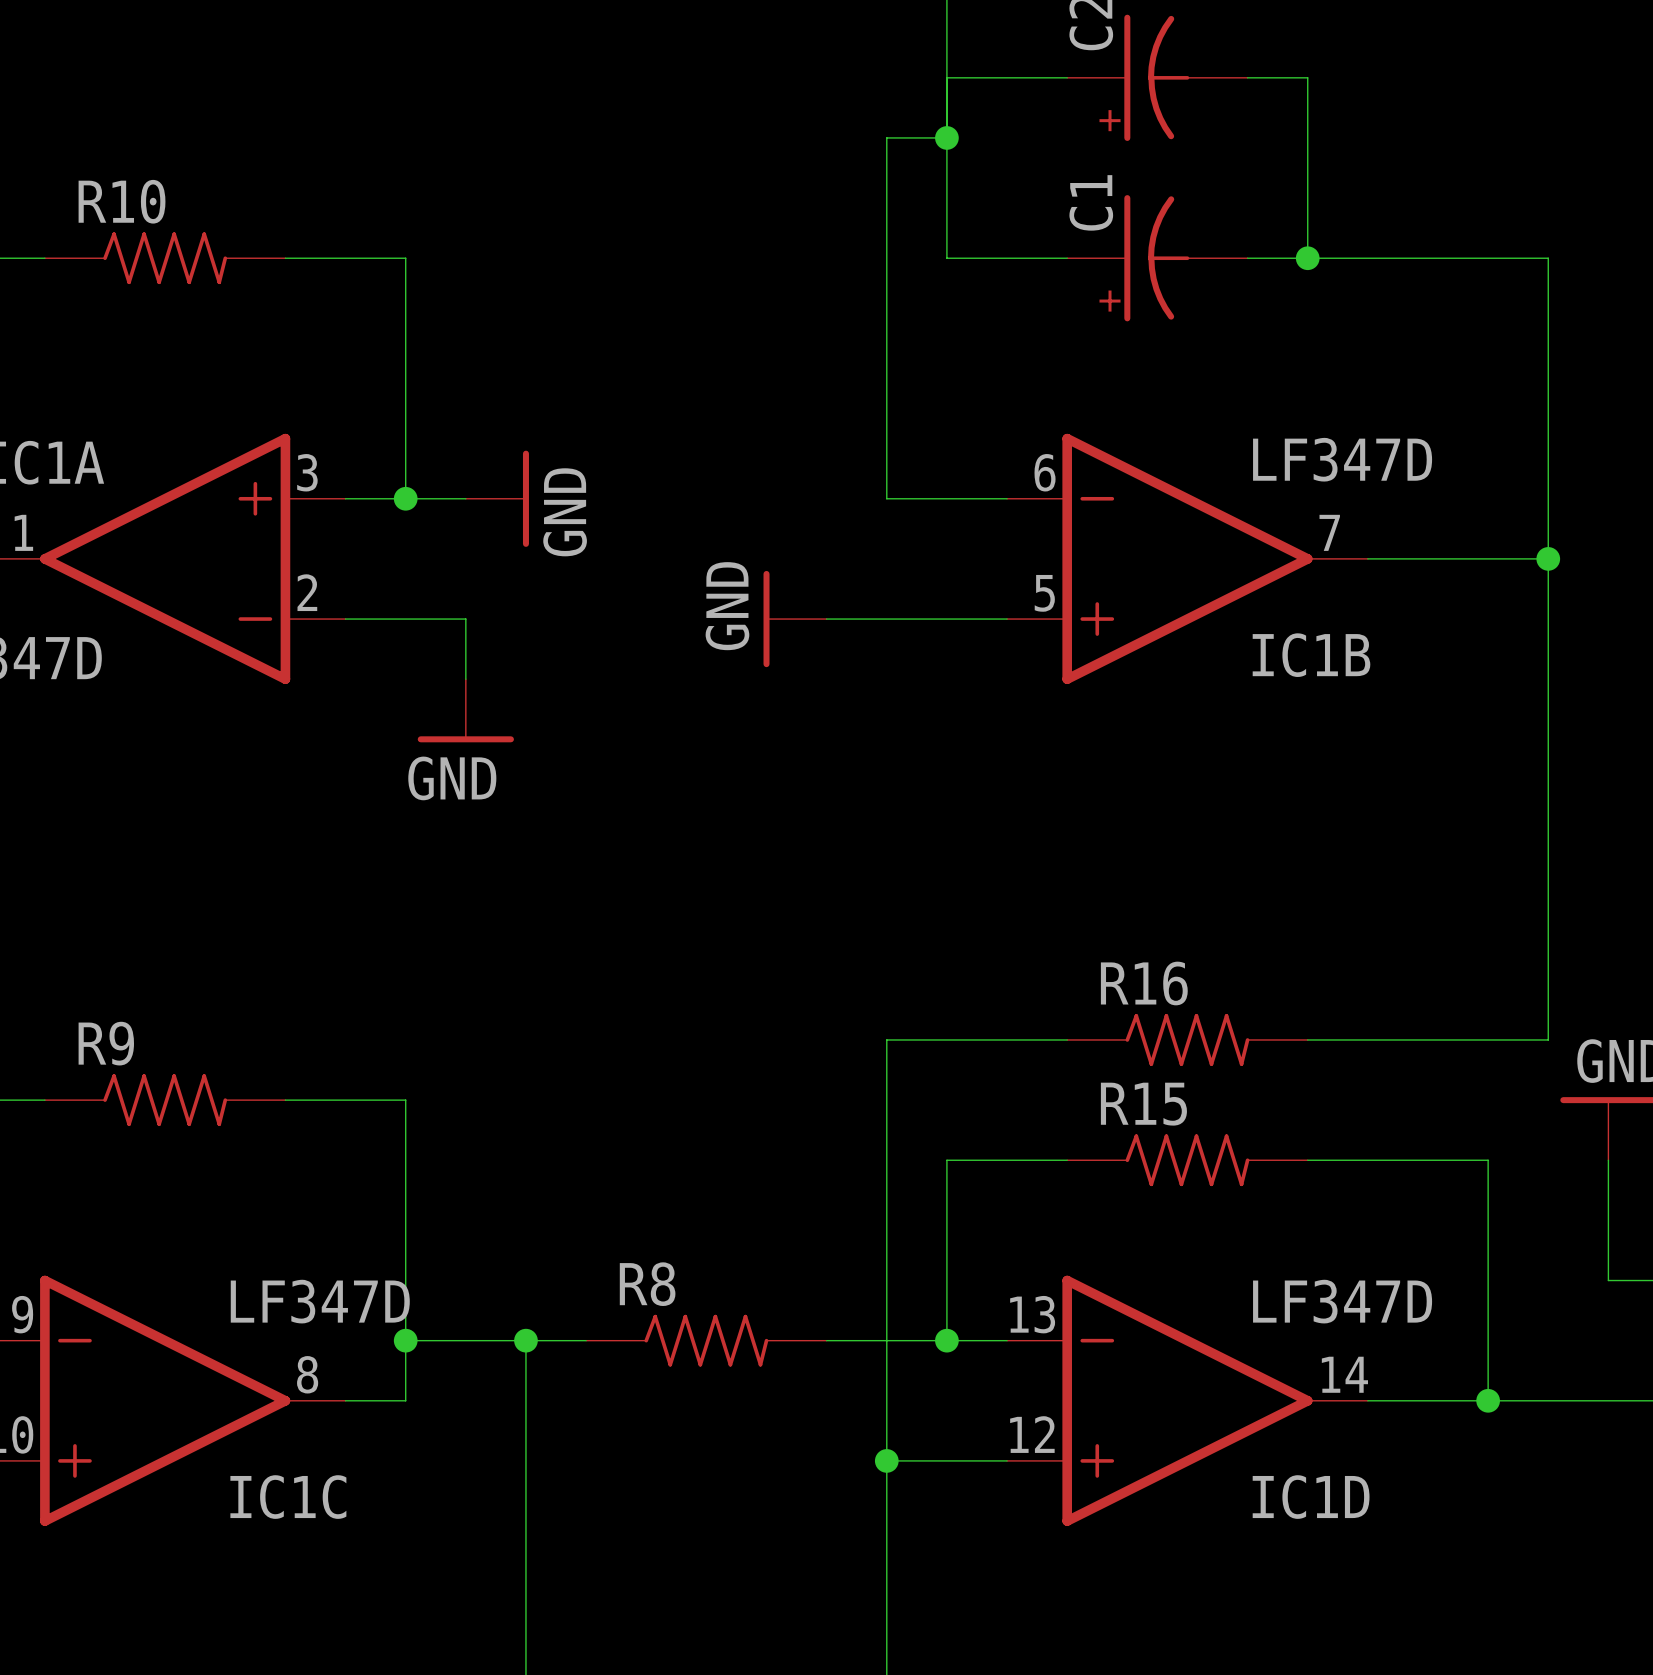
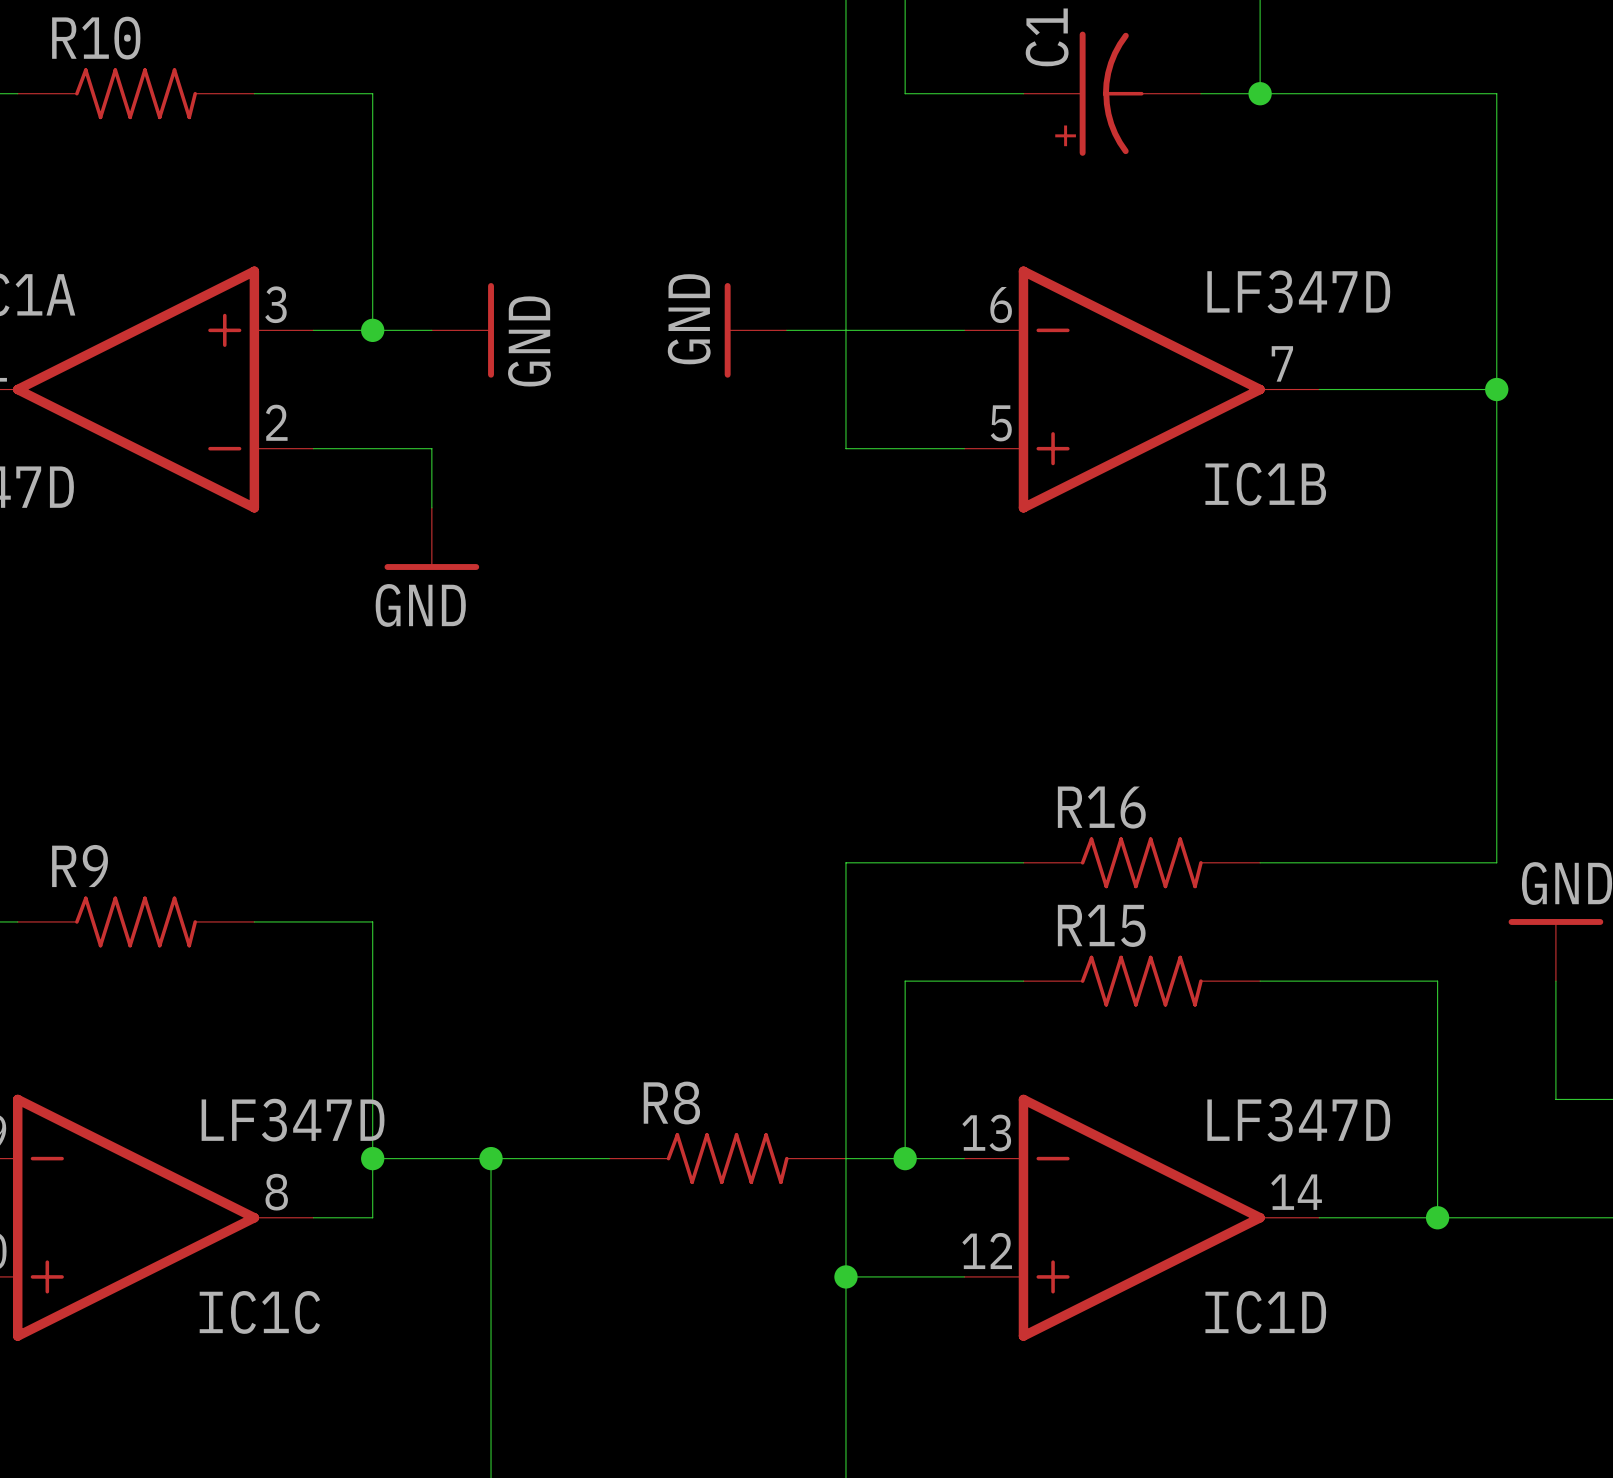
power symbol position: GND (795, 619) -> GND (755, 330)
wire: (826, 619) (886, 619) -> (786, 330) (845, 330) (845, 448)
R8 position: (706, 1340) -> (727, 1158)

